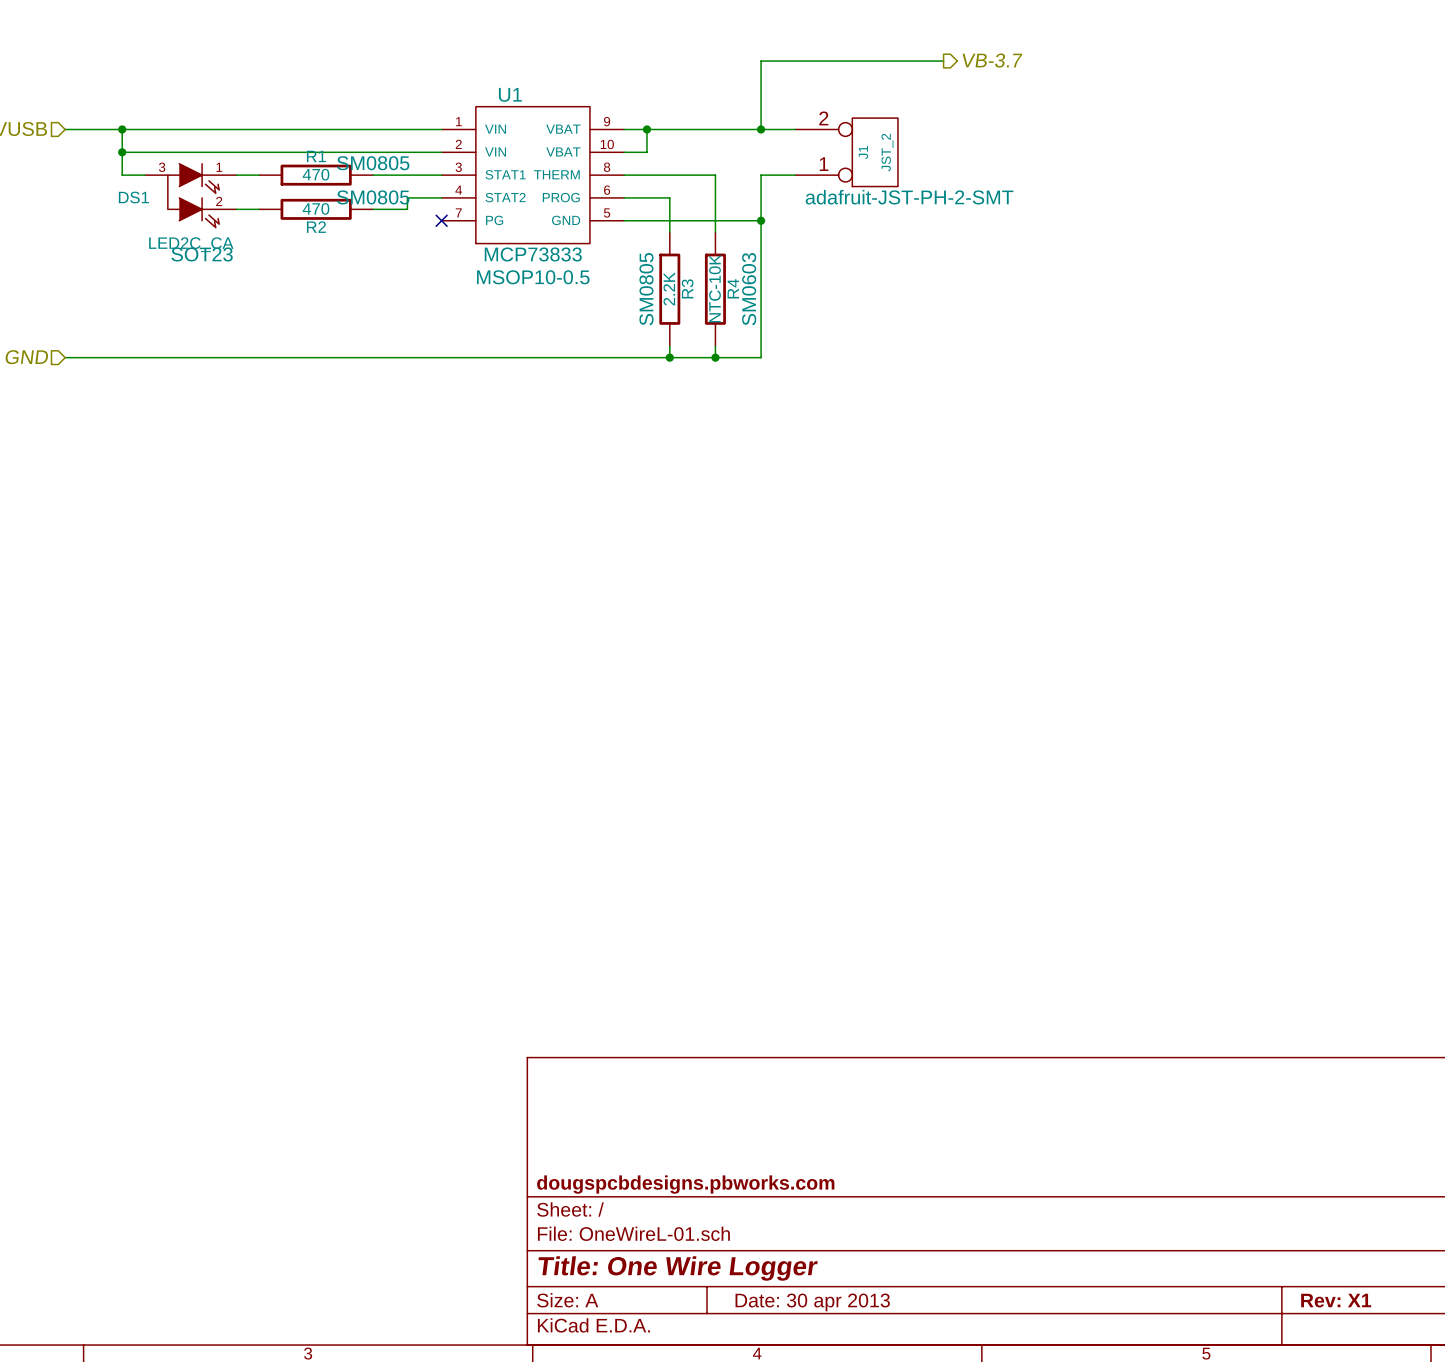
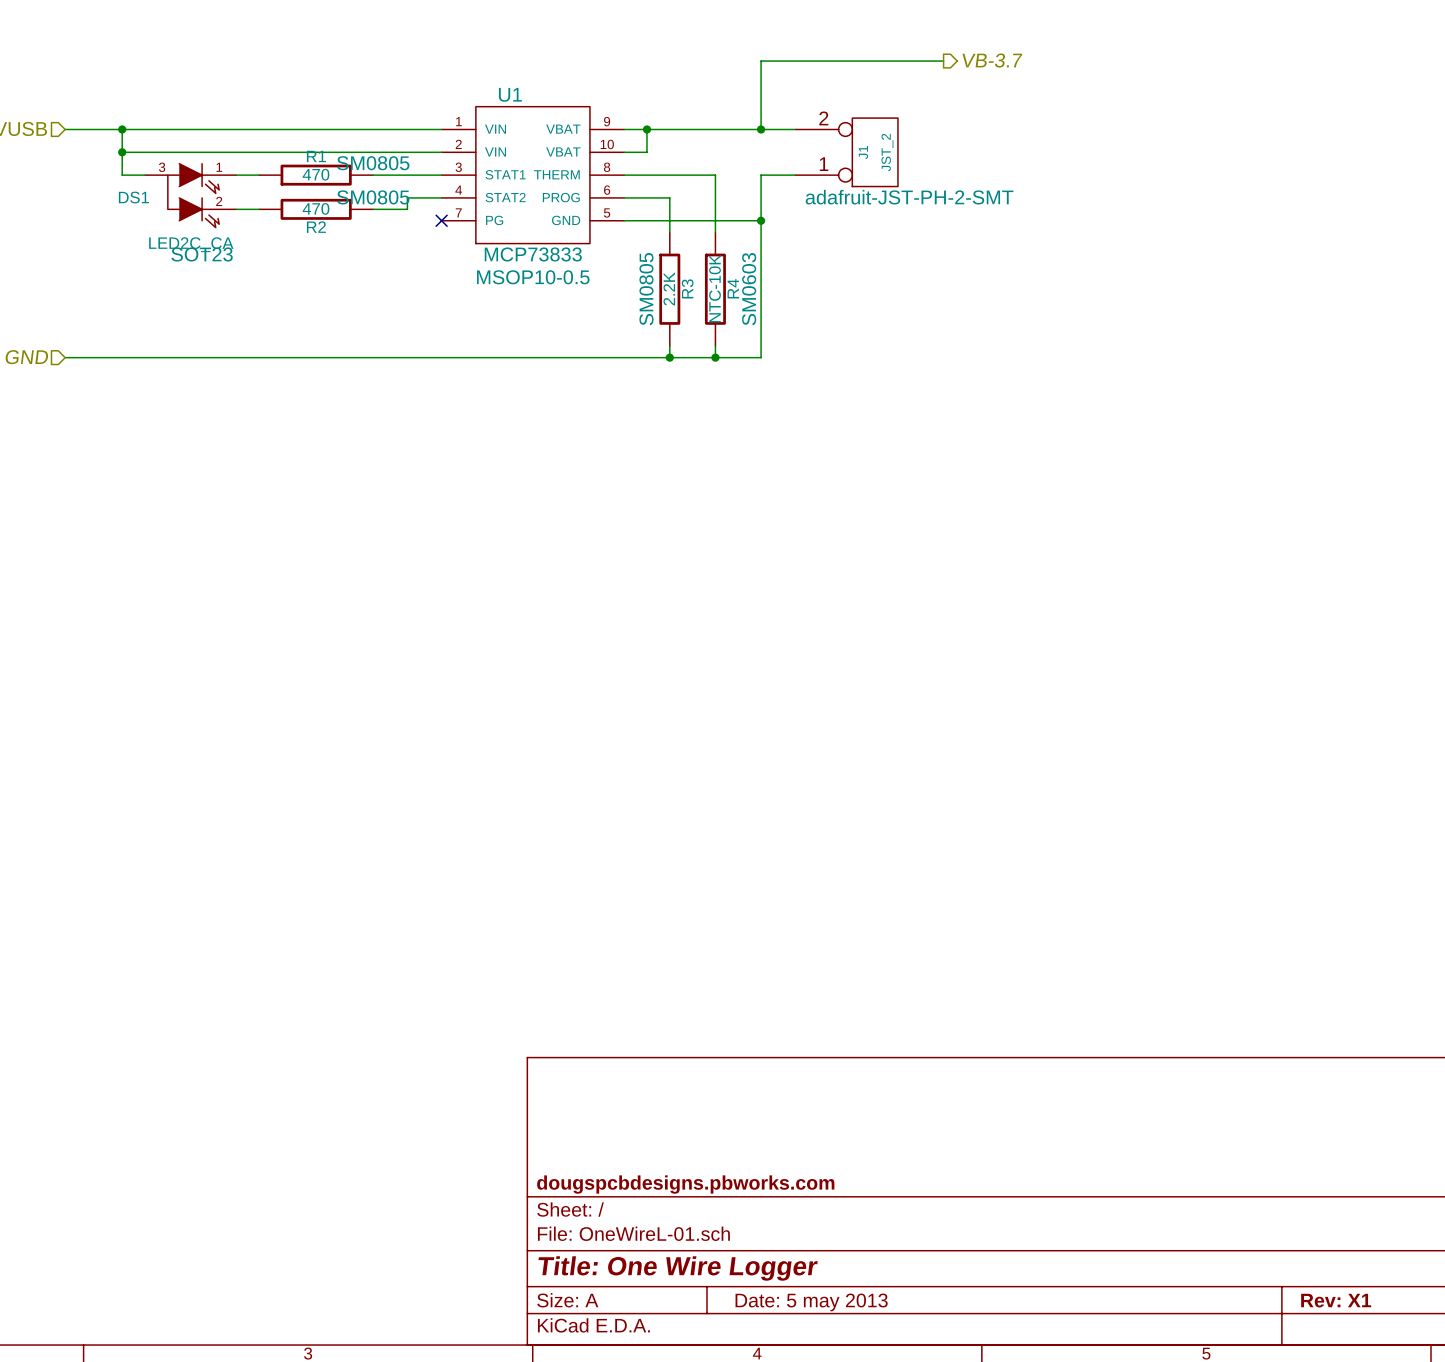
title block: Date: 30 apr 2013 (812, 1302) -> Date: 5 may 2013 (811, 1302)

